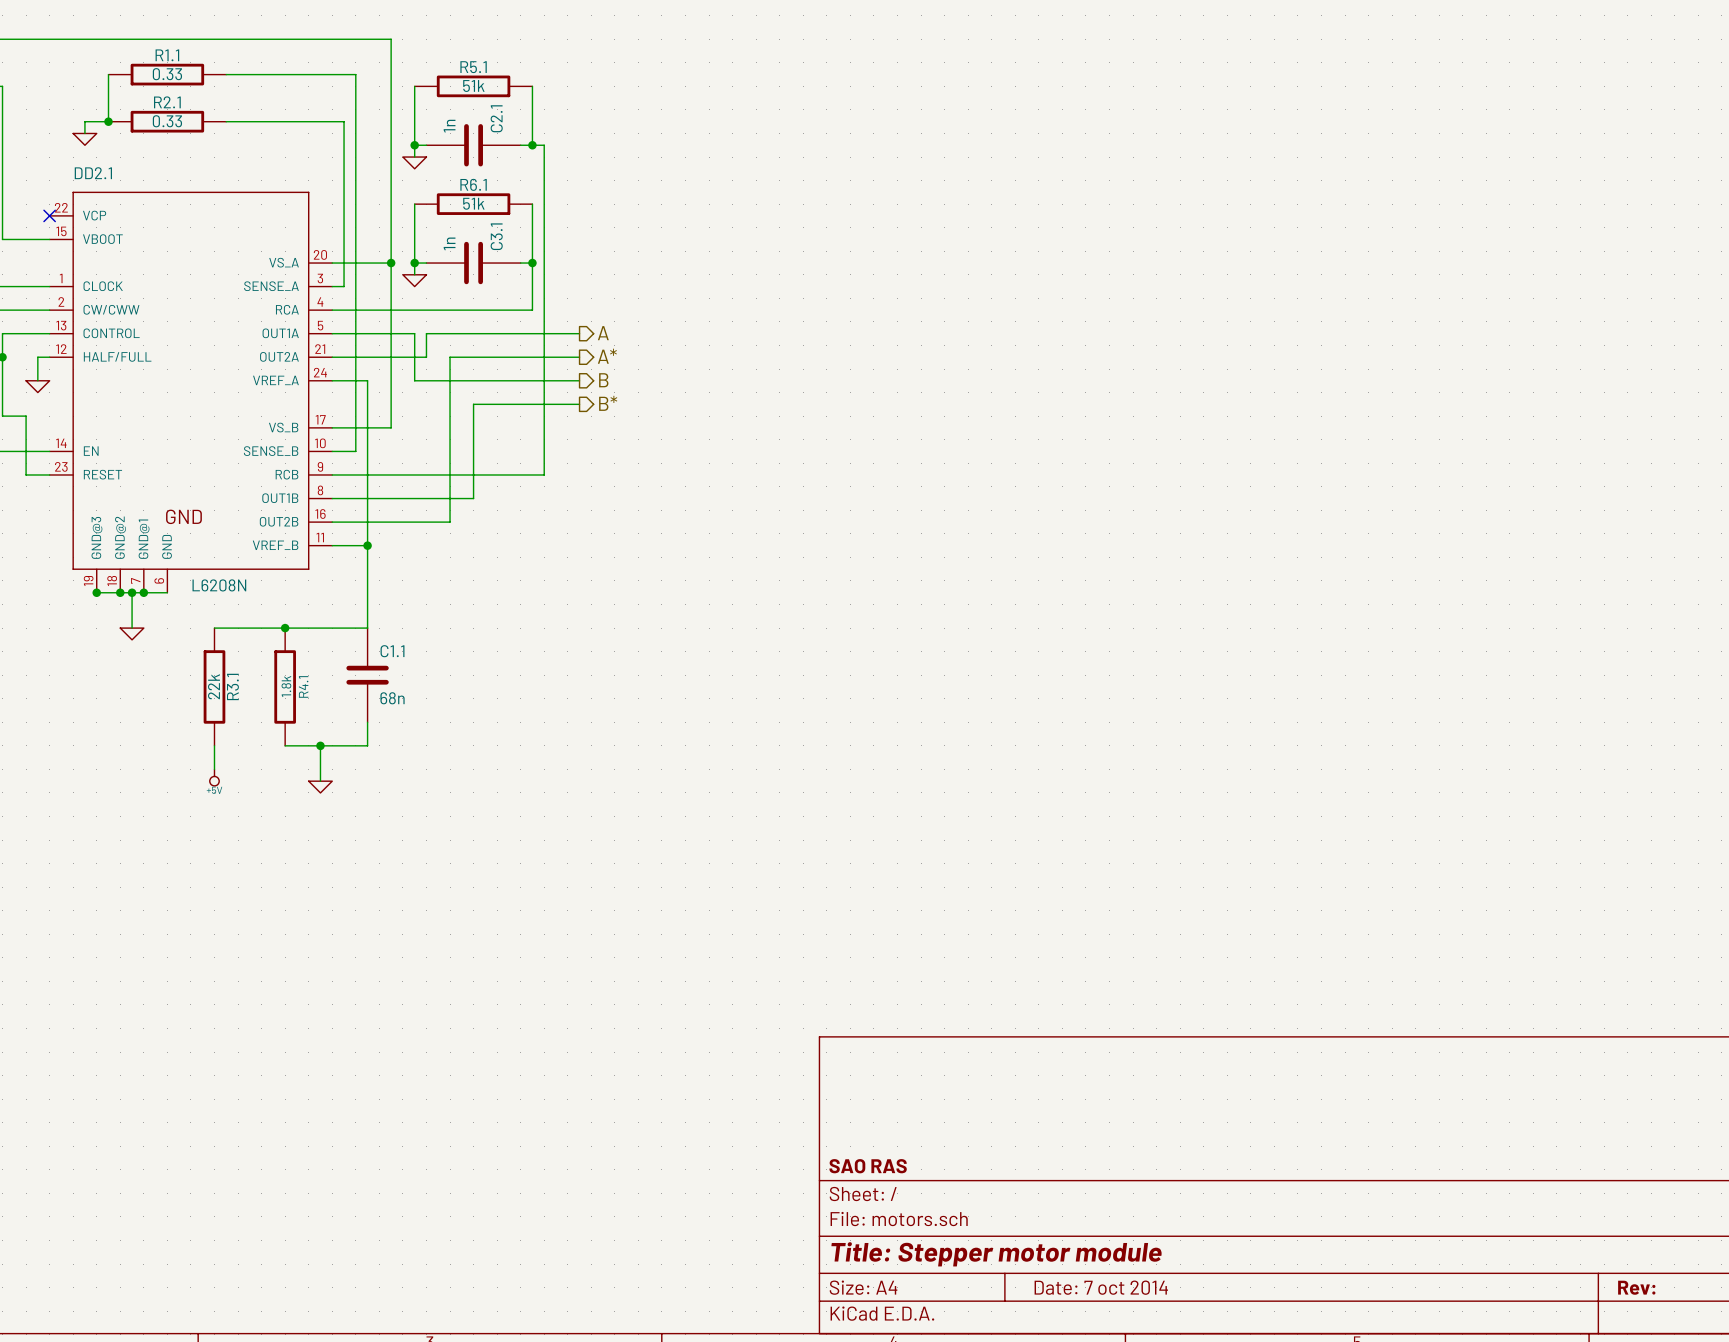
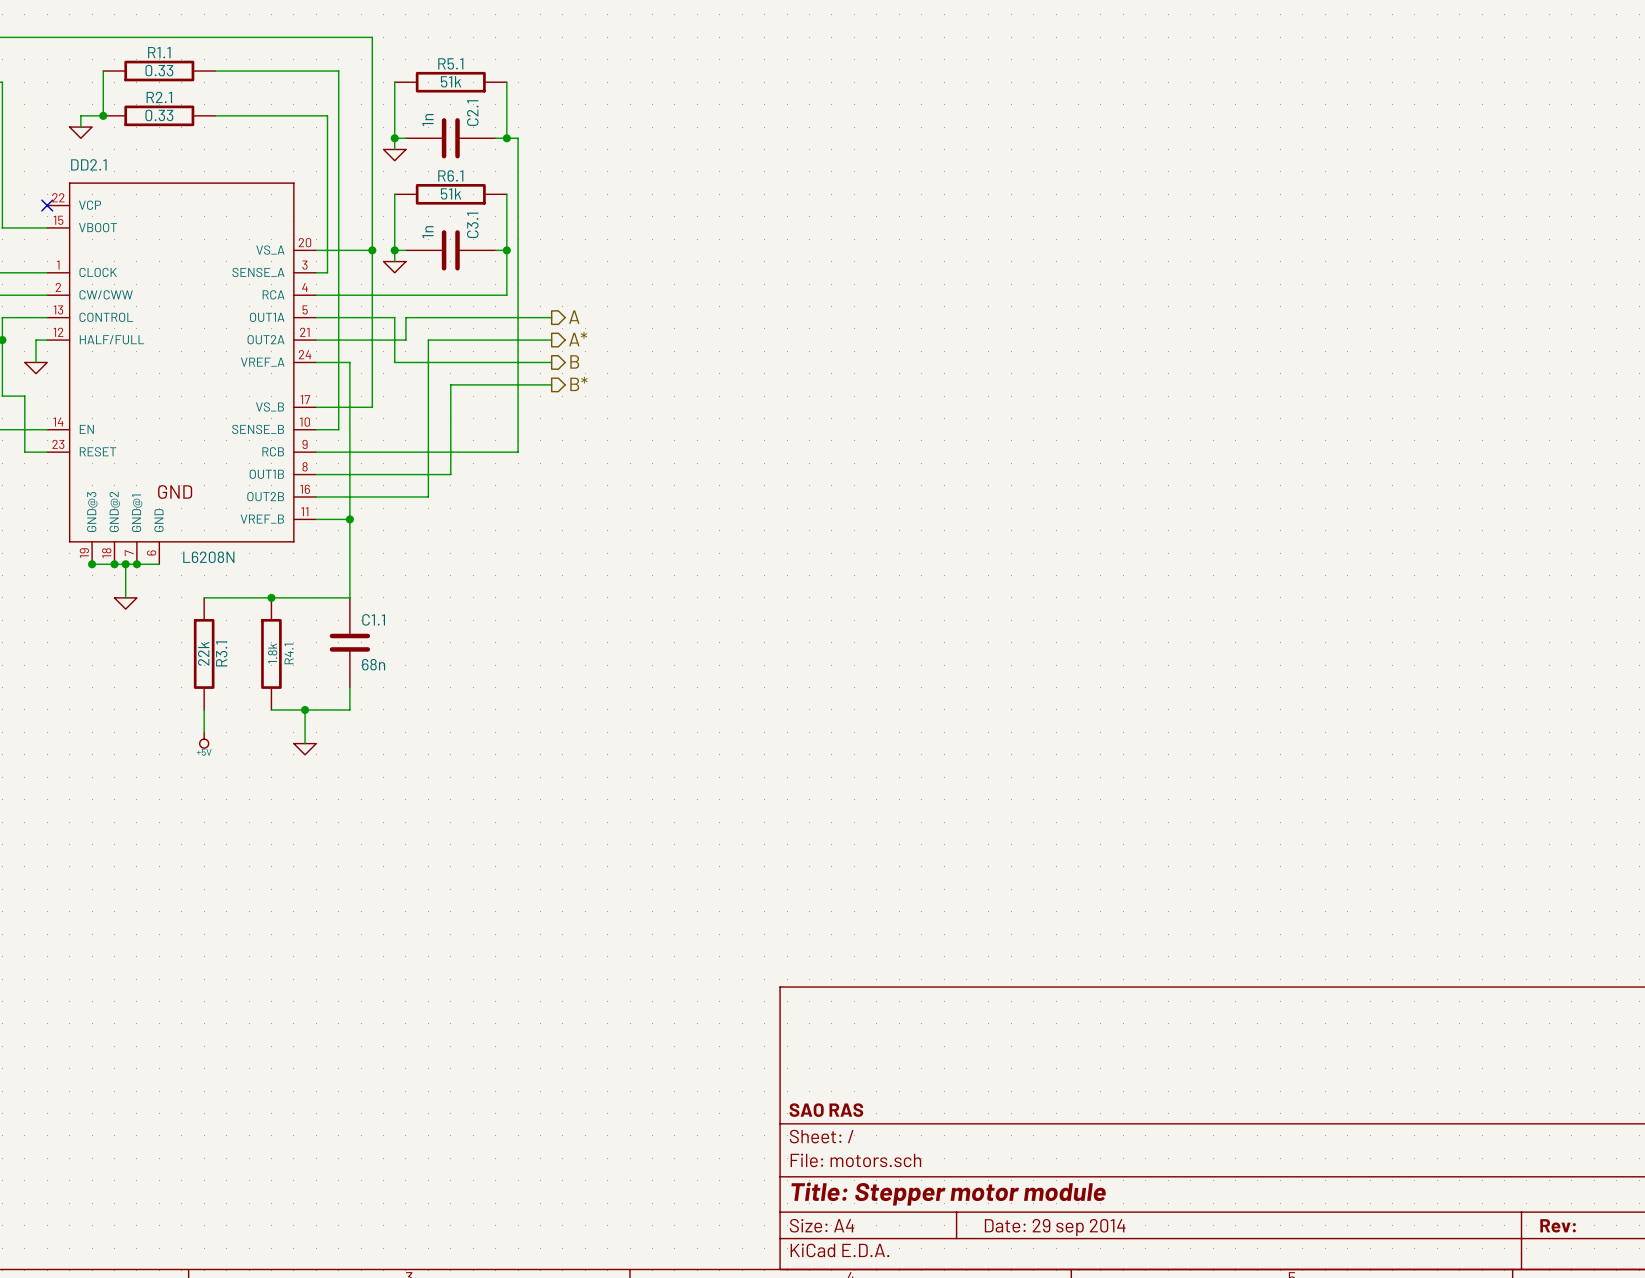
title block: Date: 7 oct 2014 (1101, 1287) -> Date: 29 sep 2014 (1055, 1227)

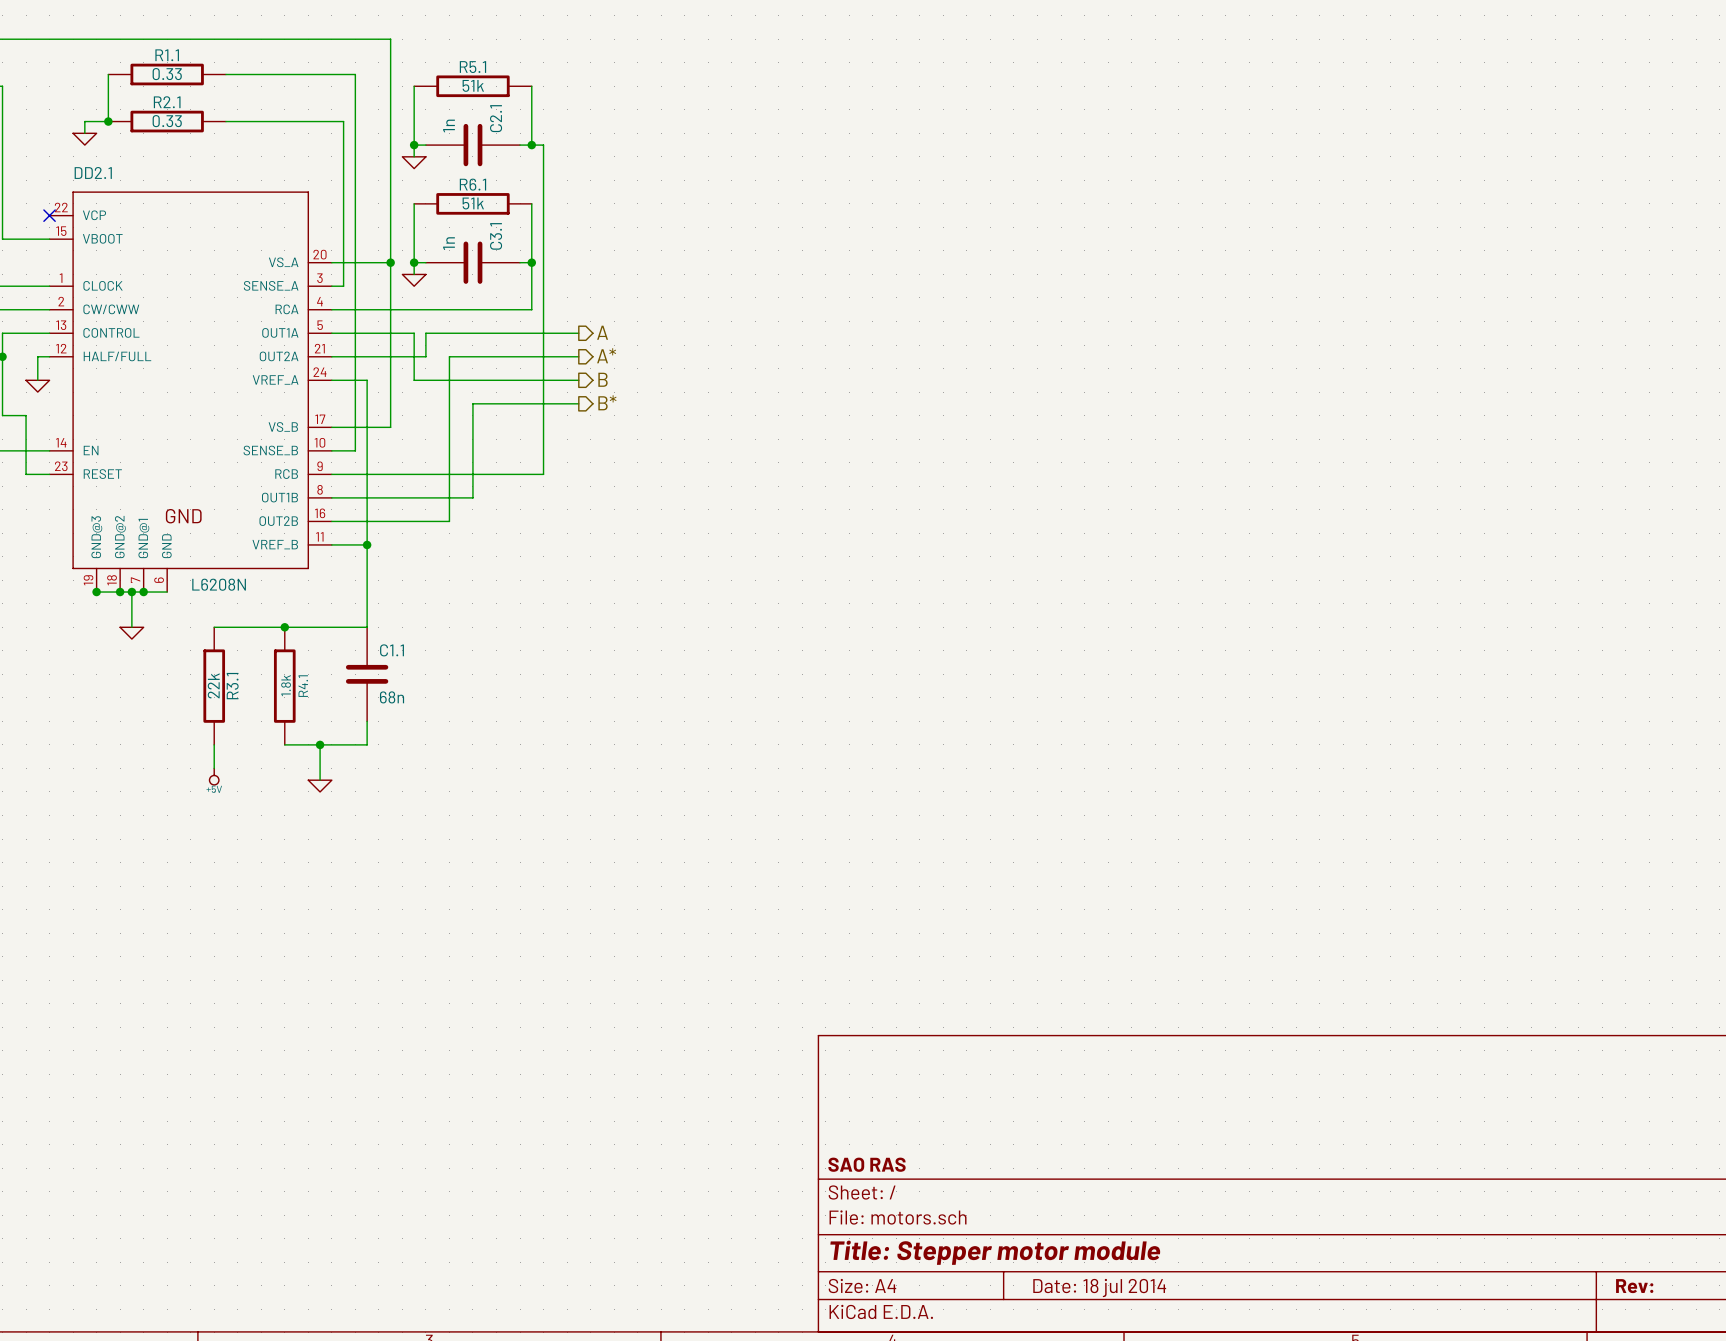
title block: Date: 29 sep 2014 (1055, 1227) -> Date: 18 jul 2014 (1099, 1288)

